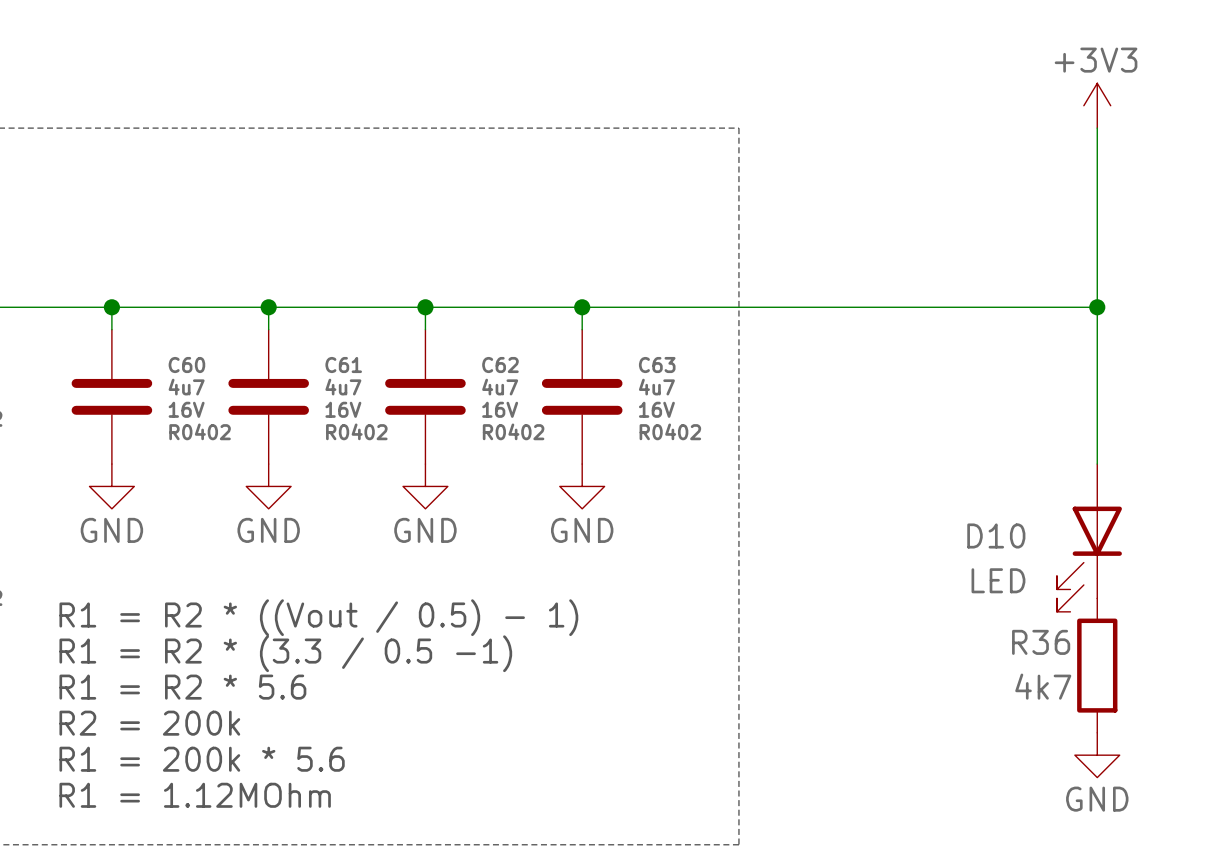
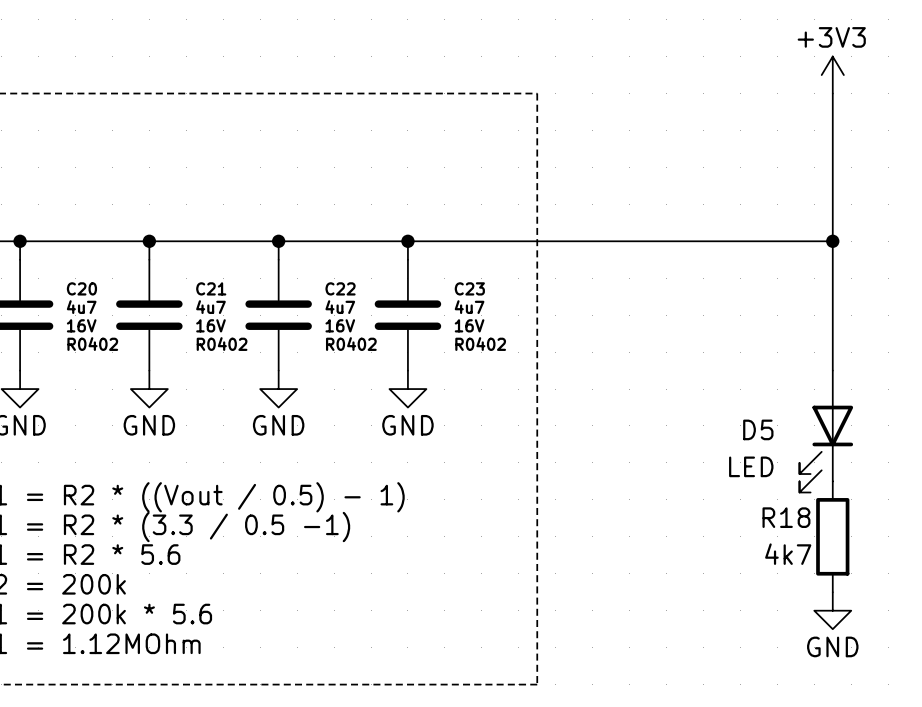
C60 name: C60 (186, 365) -> C20 (81, 288)
C61 name: C61 (343, 365) -> C21 (211, 288)
C62 name: C62 (500, 365) -> C22 (340, 288)
C63 name: C63 (657, 365) -> C23 (469, 288)
D10 name: D10 (996, 535) -> D5 (758, 429)
R36 name: R36 (1041, 642) -> R18 (786, 517)

